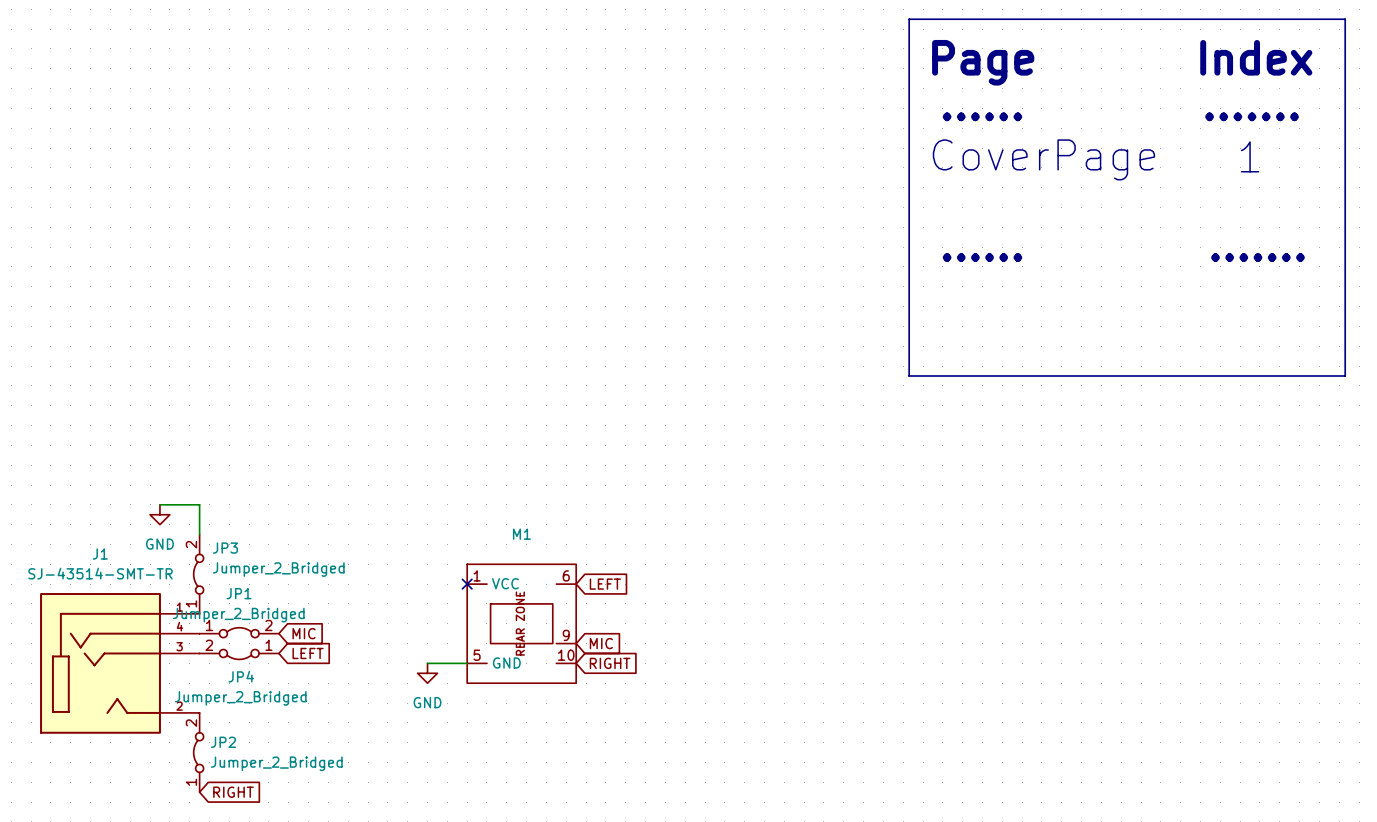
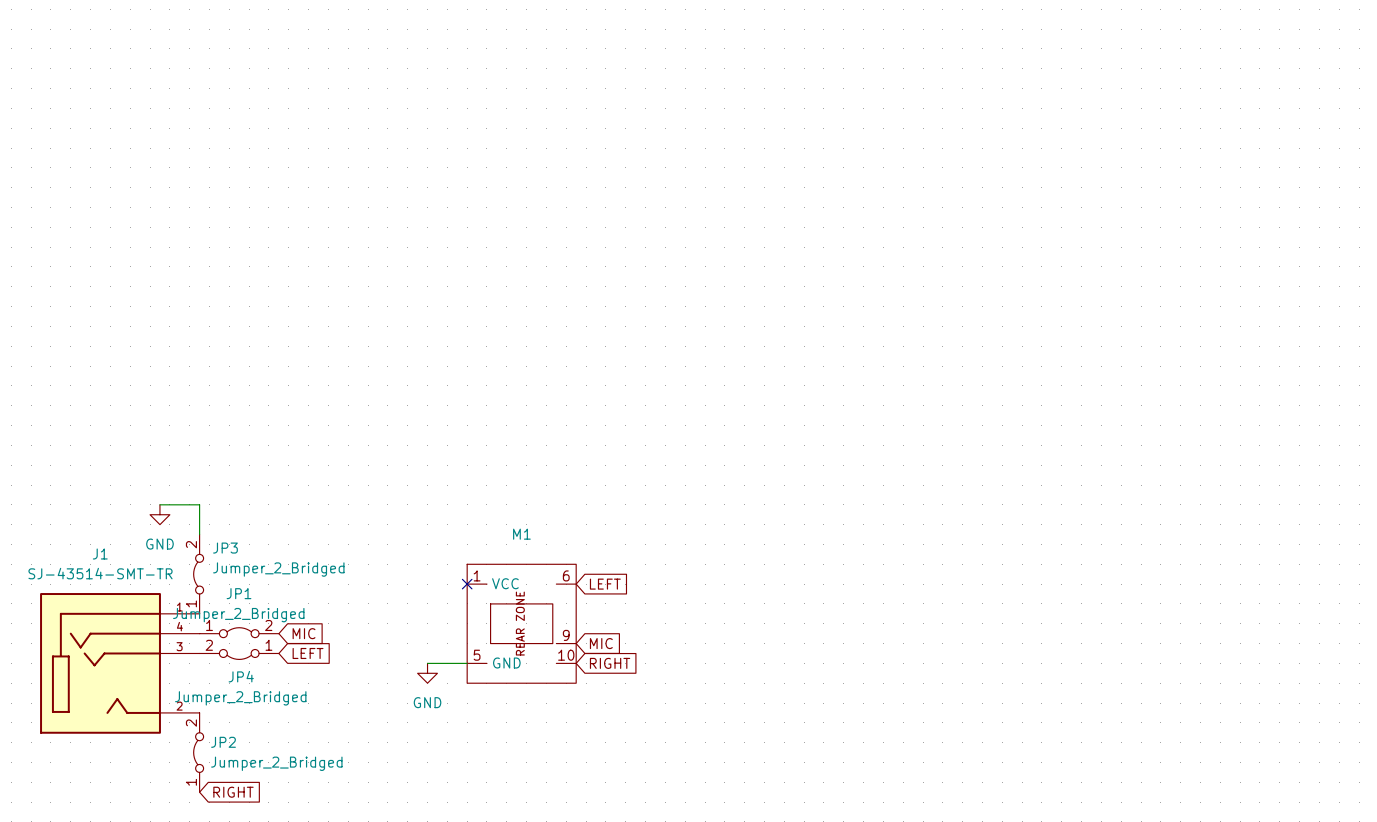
line: (909, 19) (1345, 19) (1345, 376) (909, 376) (909, 19) -> none
text: Index (1256, 57) -> none
text: Page (983, 62) -> none
text: ...... (982, 116) -> none
text: ....... (1252, 116) -> none
text: 1 (1250, 156) -> none
text: CoverPage (1043, 159) -> none
text: ...... (982, 257) -> none
text: ....... (1257, 257) -> none

